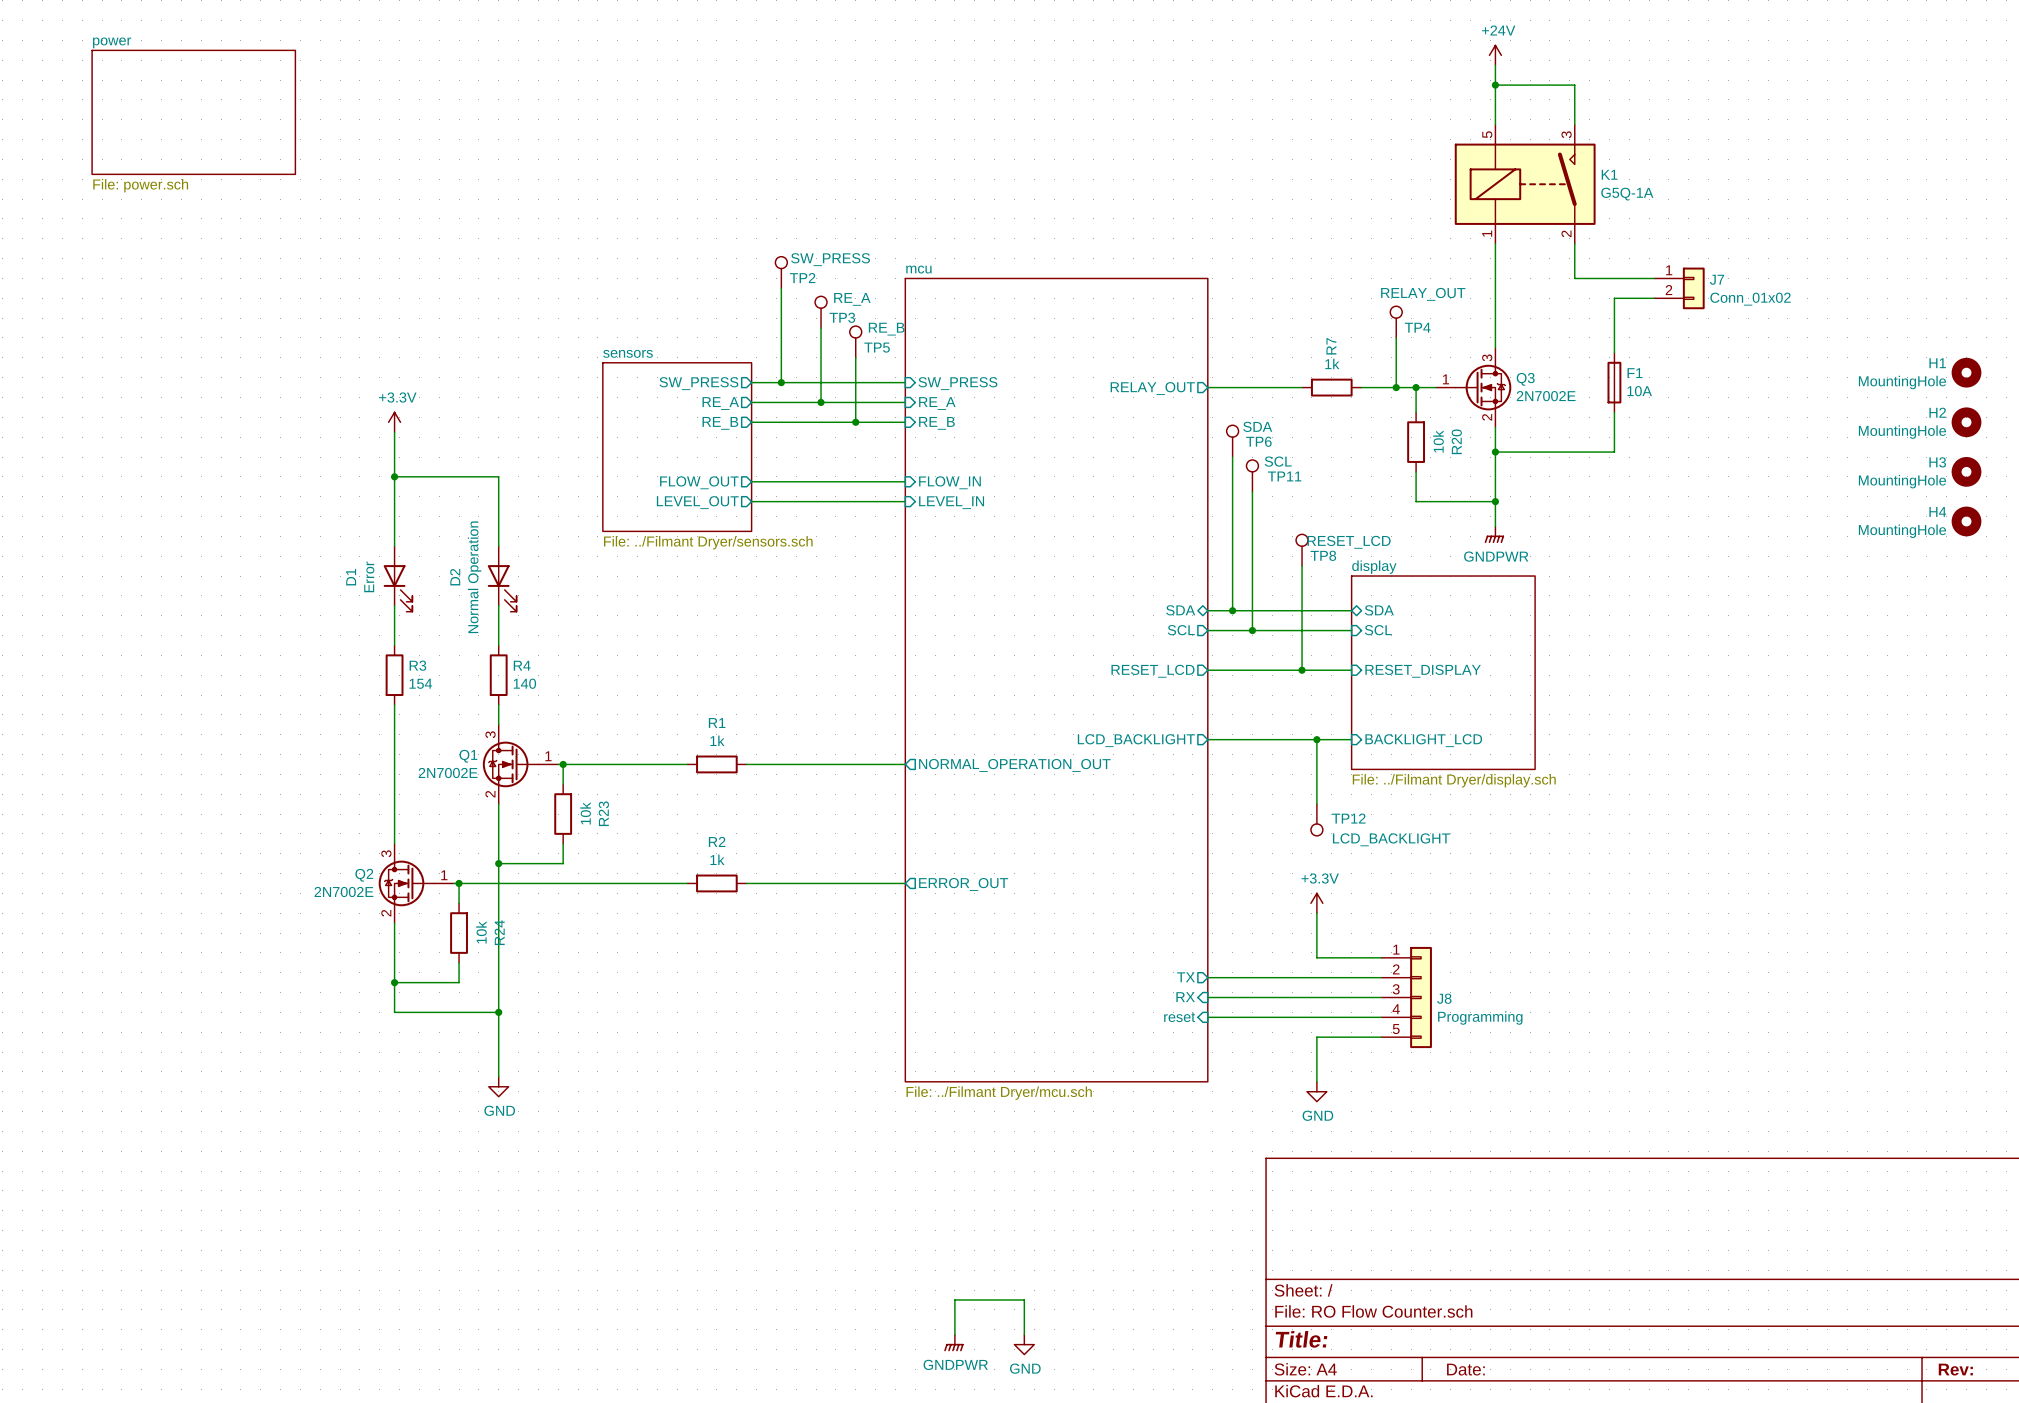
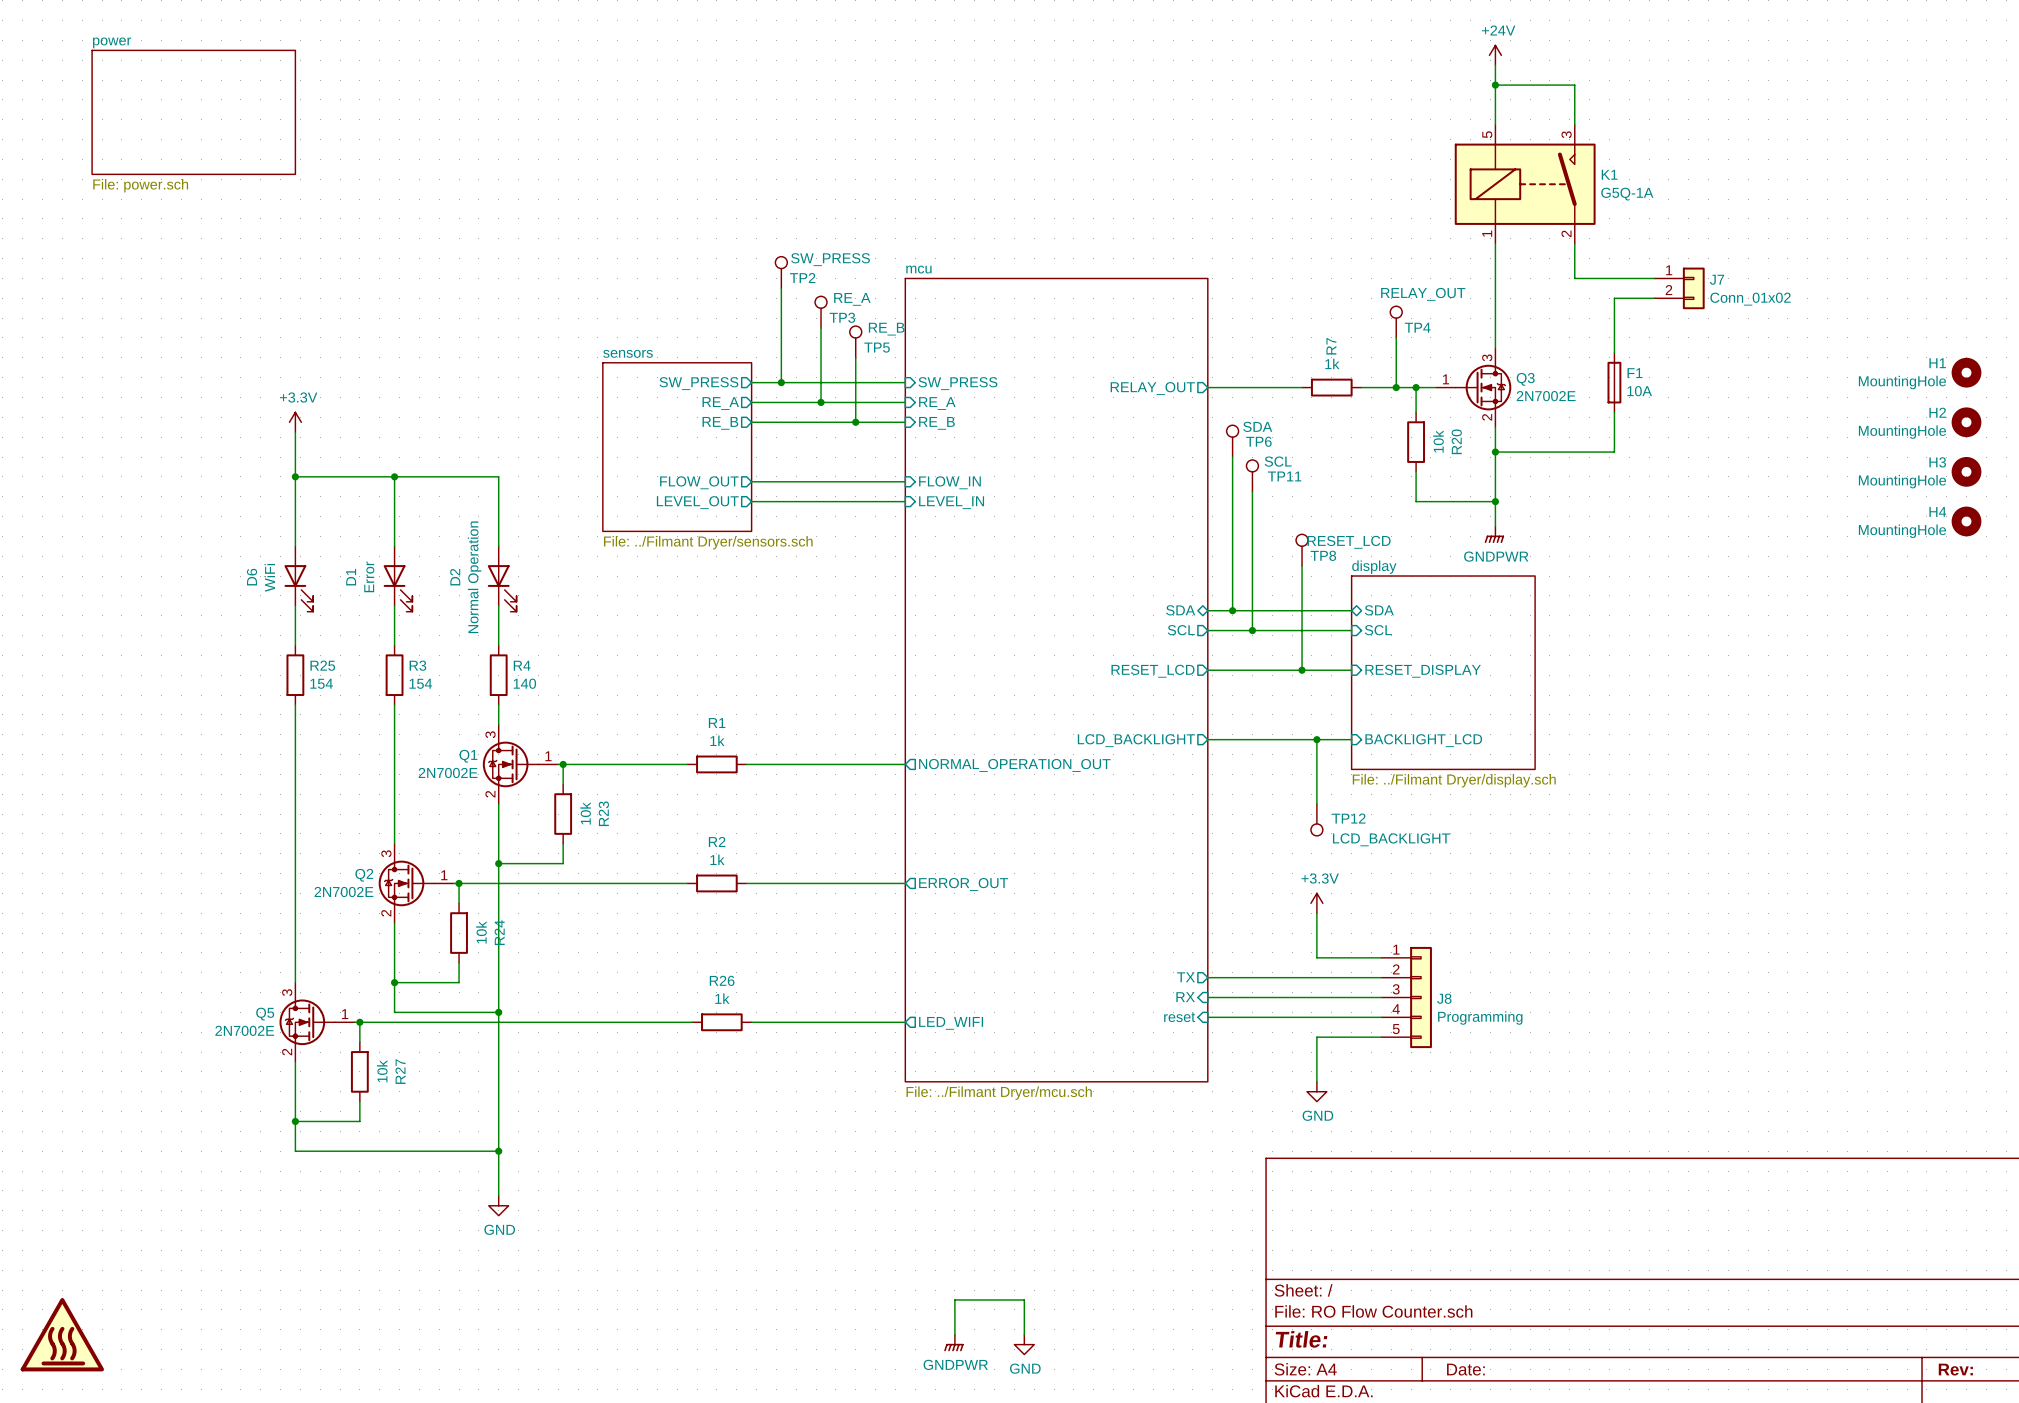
power symbol position: +3.3V (394, 422) -> +3.3V (295, 422)
wire: none -> (295, 432) (295, 546)
wire: (394, 432) (394, 476) -> (295, 476) (394, 476)
junction: none -> (295, 476)
D6: none -> WiFi (298, 578)
wire: none -> (295, 605) (295, 645)
R25: none -> 154 (295, 675)
wire: none -> (295, 704) (295, 982)
Q5: none -> 2N7002E (317, 1022)
wire: none -> (354, 1022) (692, 1022)
wire: none -> (359, 1022) (359, 1042)
junction: none -> (359, 1022)
R26: none -> 1k (721, 1022)
wire: none -> (751, 1022) (905, 1022)
sheet pin: none -> LED_WIFI (951, 1023)
wire: none -> (295, 1061) (295, 1151) (498, 1151)
R27: none -> 10k (359, 1071)
wire: none -> (498, 1076) (498, 1195)
power symbol position: GND (498, 1086) -> GND (498, 1205)
wire: none -> (359, 1101) (359, 1121) (295, 1121)
junction: none -> (295, 1121)
junction: none -> (498, 1151)
power symbol: none -> (62, 1334)

